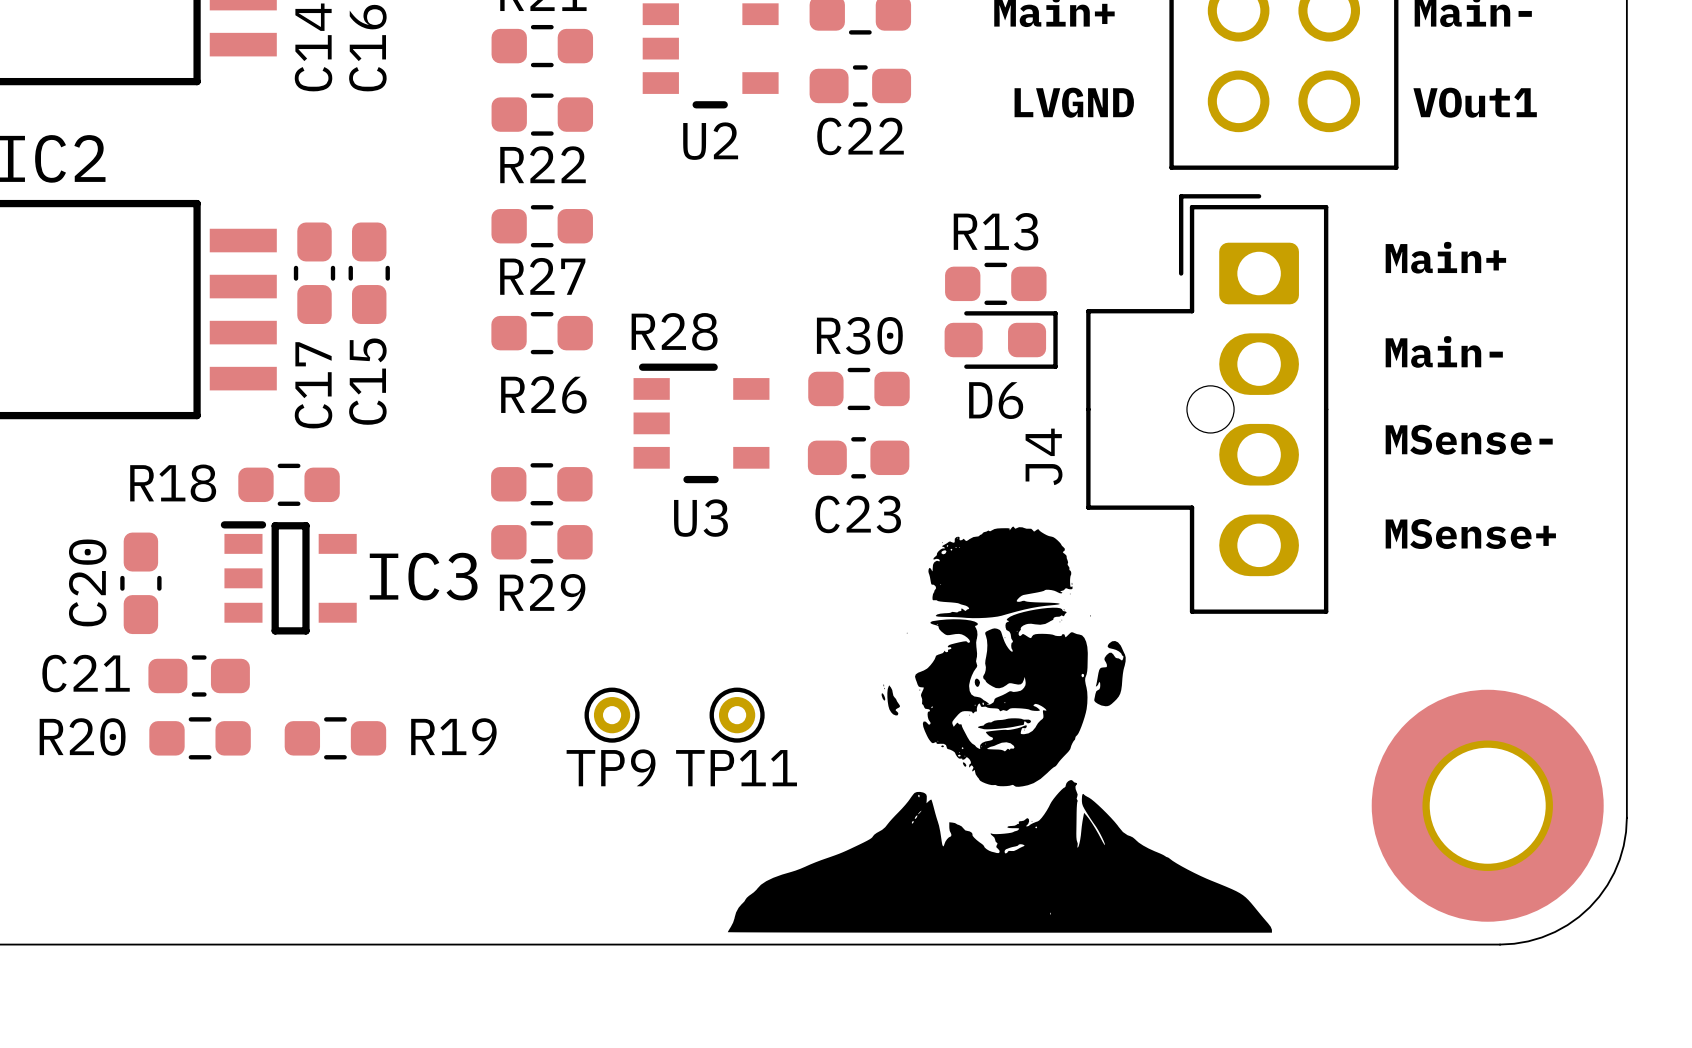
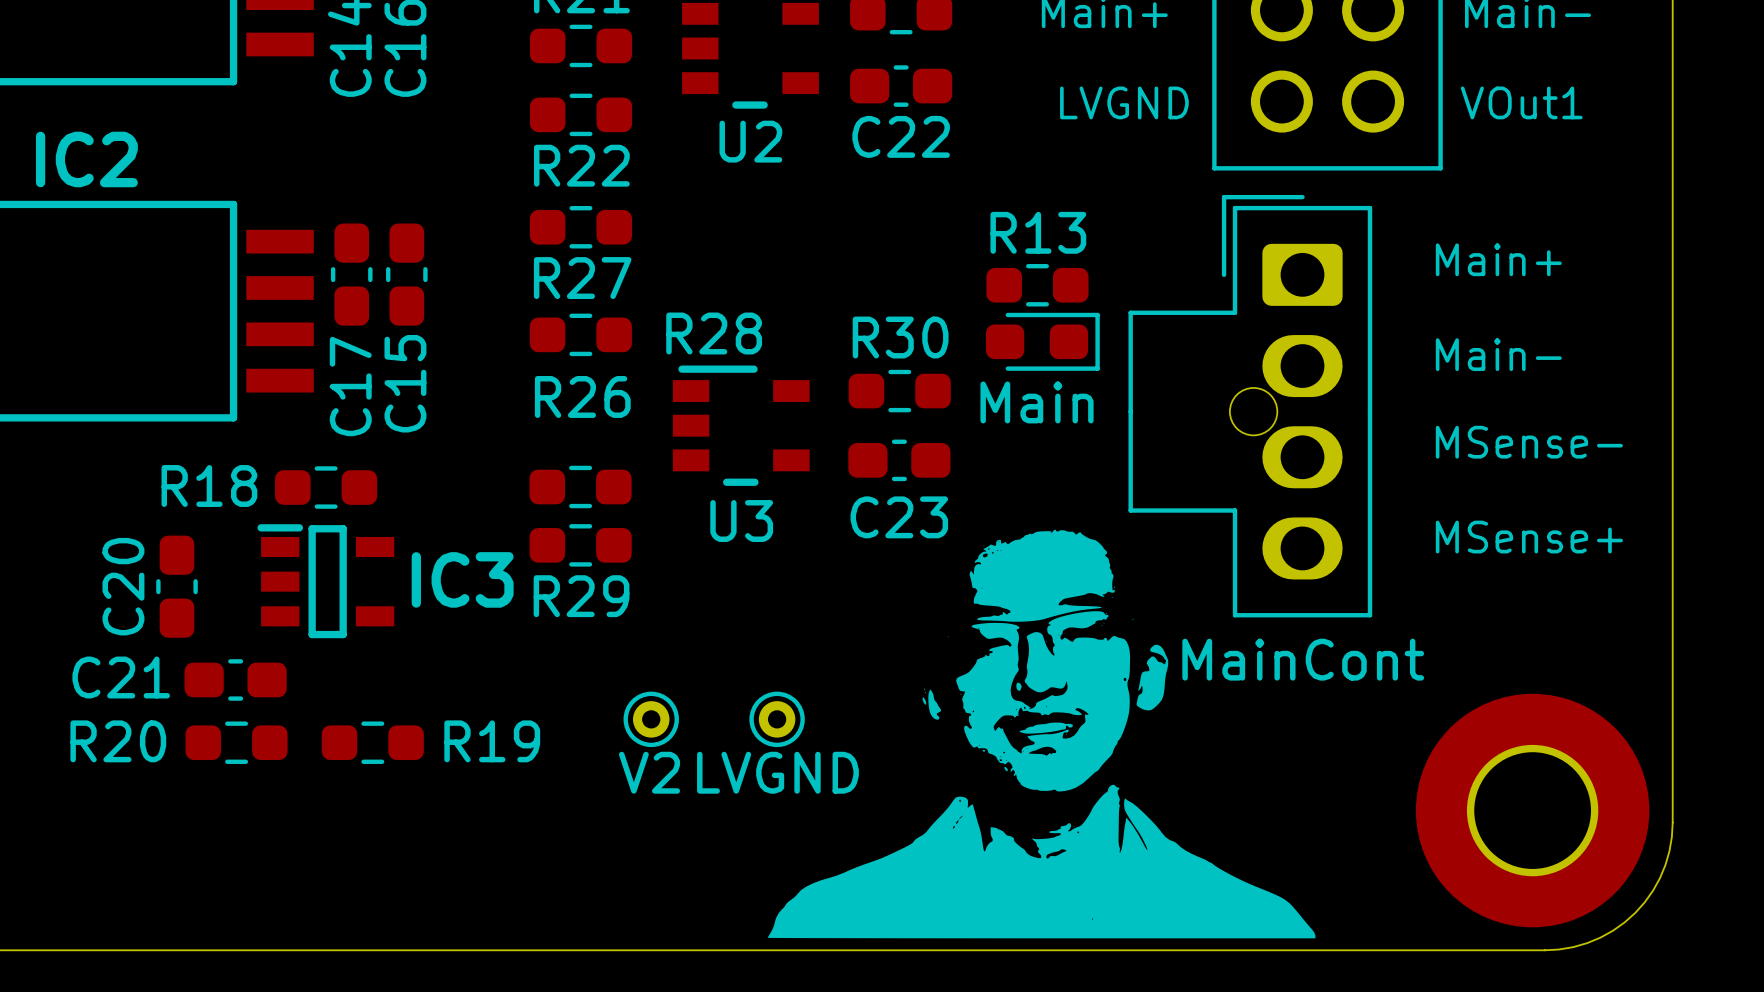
D6 name: D6 (996, 400) -> Main (1037, 402)
J4 name: J4 (1044, 456) -> MainCont (1303, 659)
TP9 name: TP9 (611, 767) -> V2 (649, 772)
TP11 name: TP11 (736, 768) -> LVGND (777, 772)

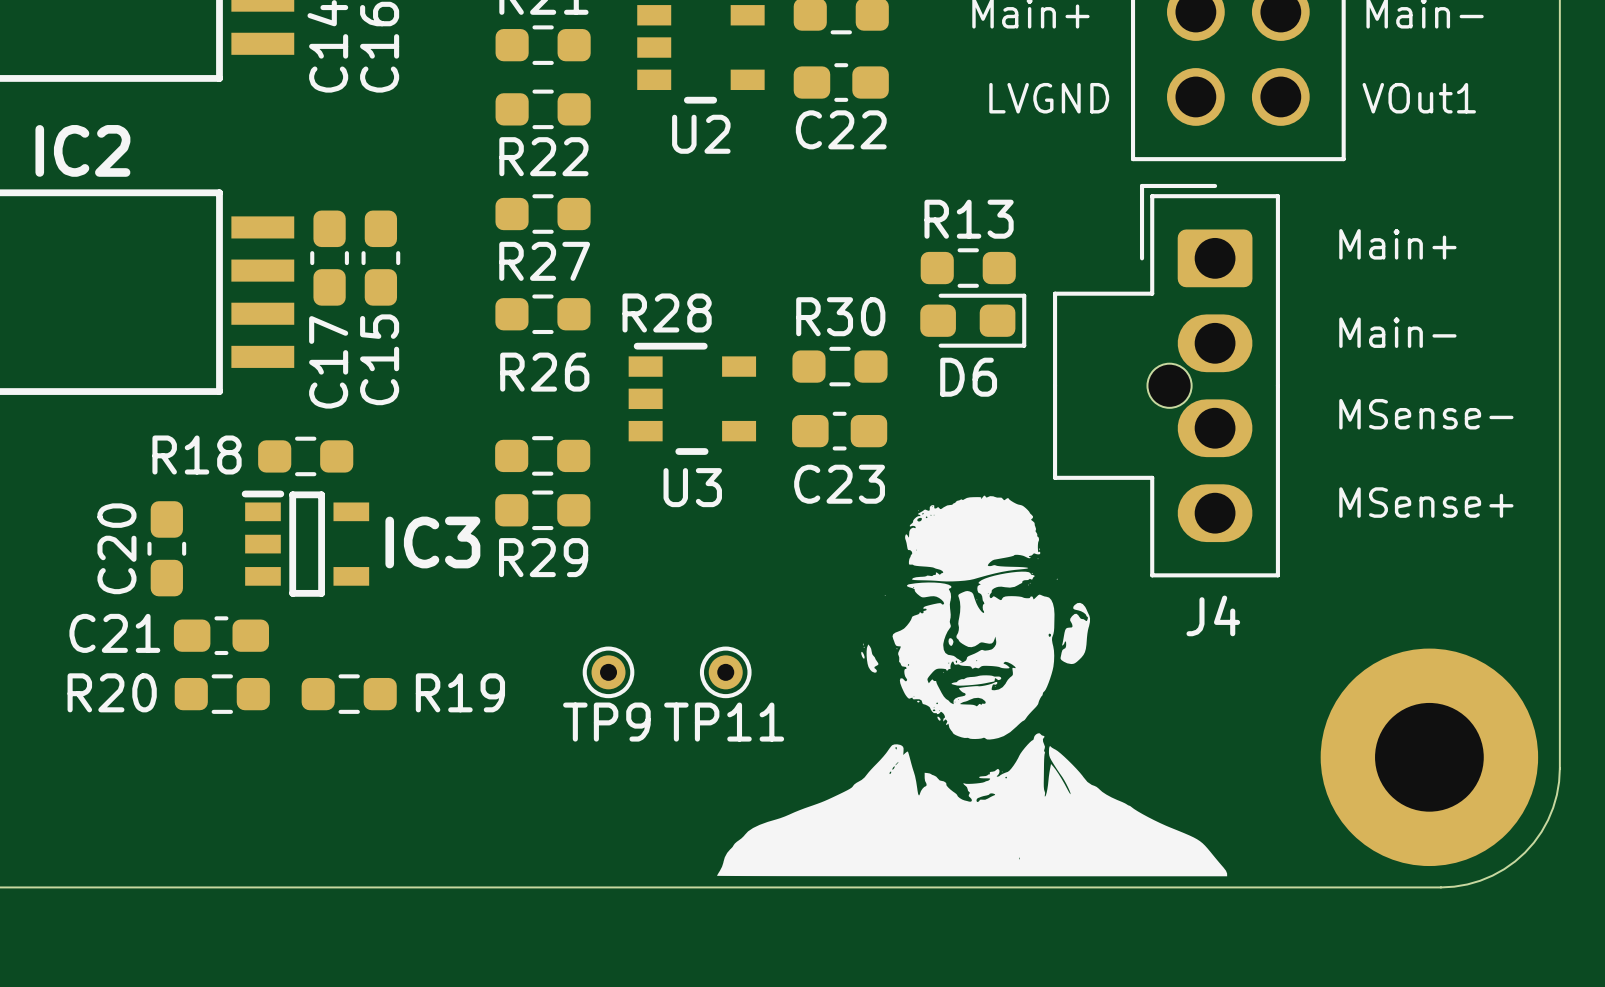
Main name: Main (1037, 402) -> D6 (968, 377)
MainCont name: MainCont (1303, 659) -> J4 (1213, 615)
V2 name: V2 (649, 772) -> TP9 (606, 722)
LVGND name: LVGND (777, 772) -> TP11 (724, 722)

